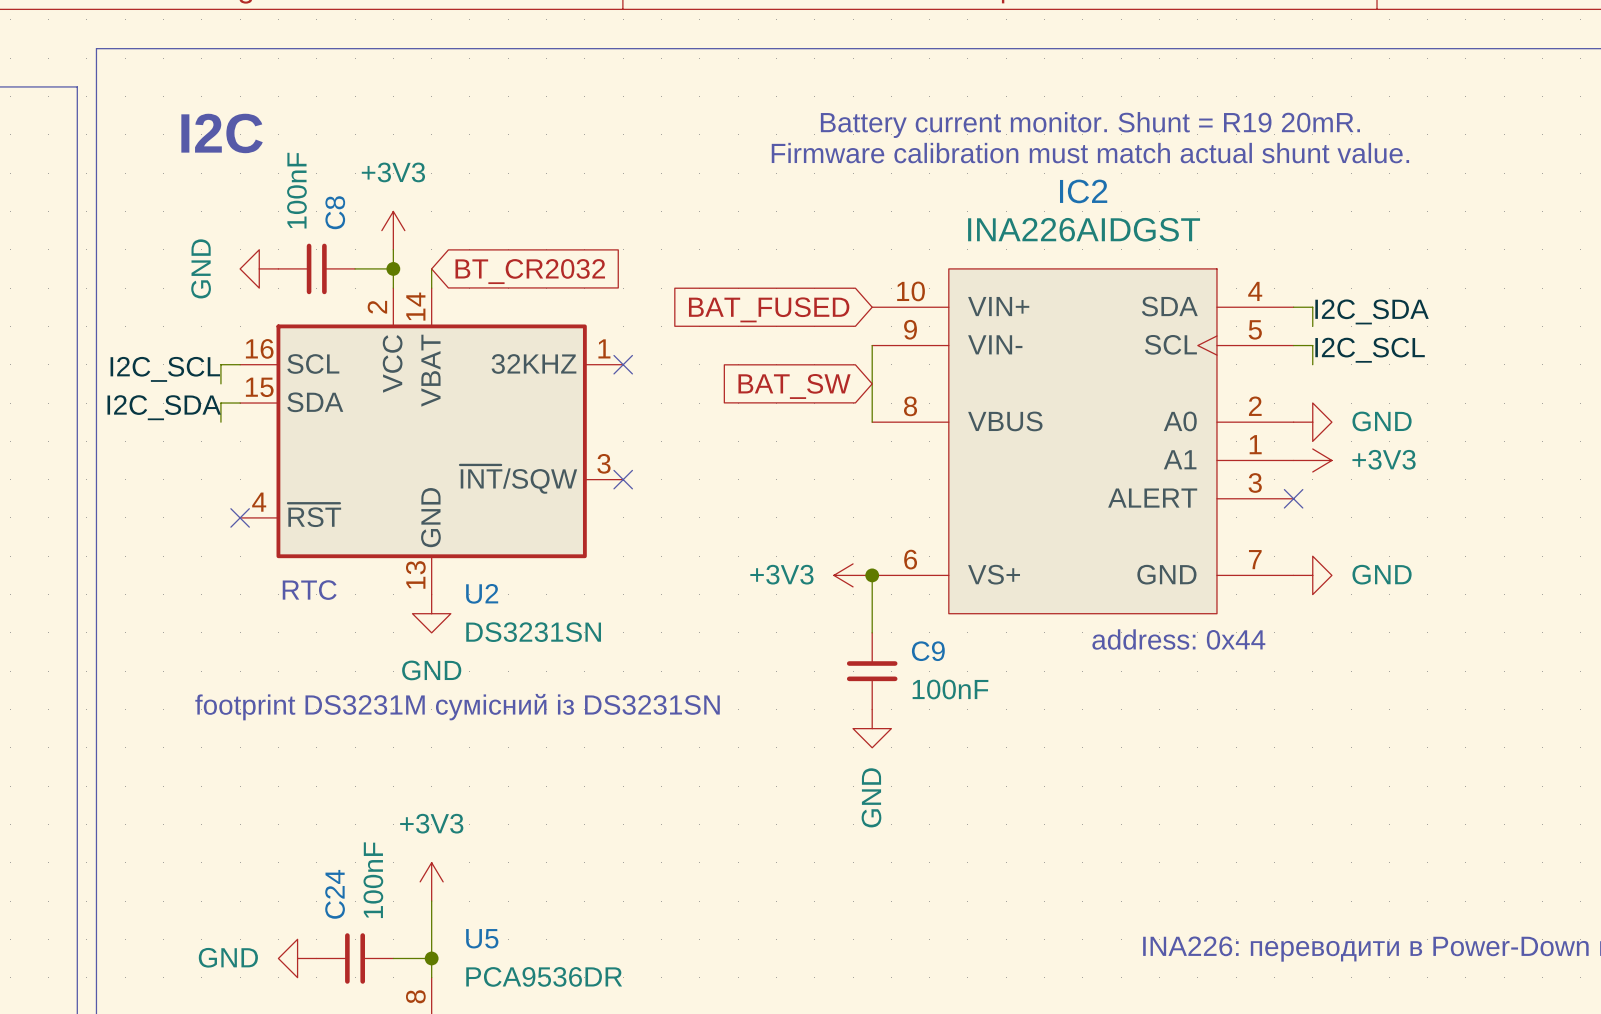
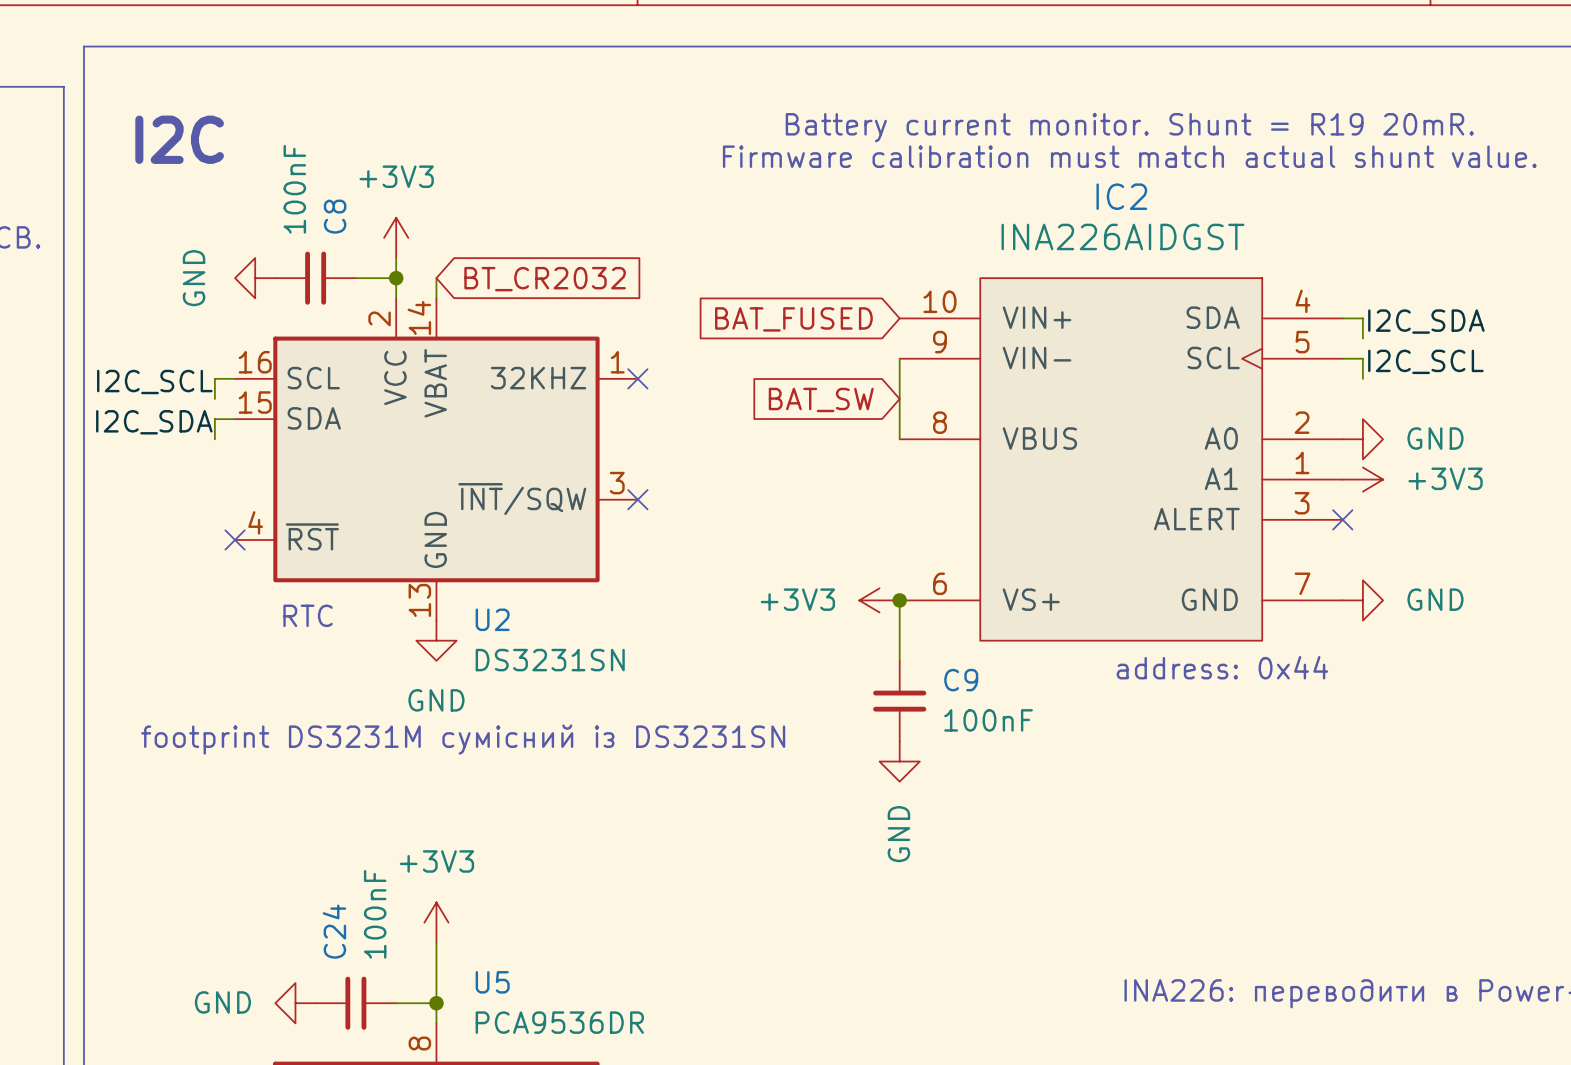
text position: I2C (222, 133) -> I2C (179, 139)

